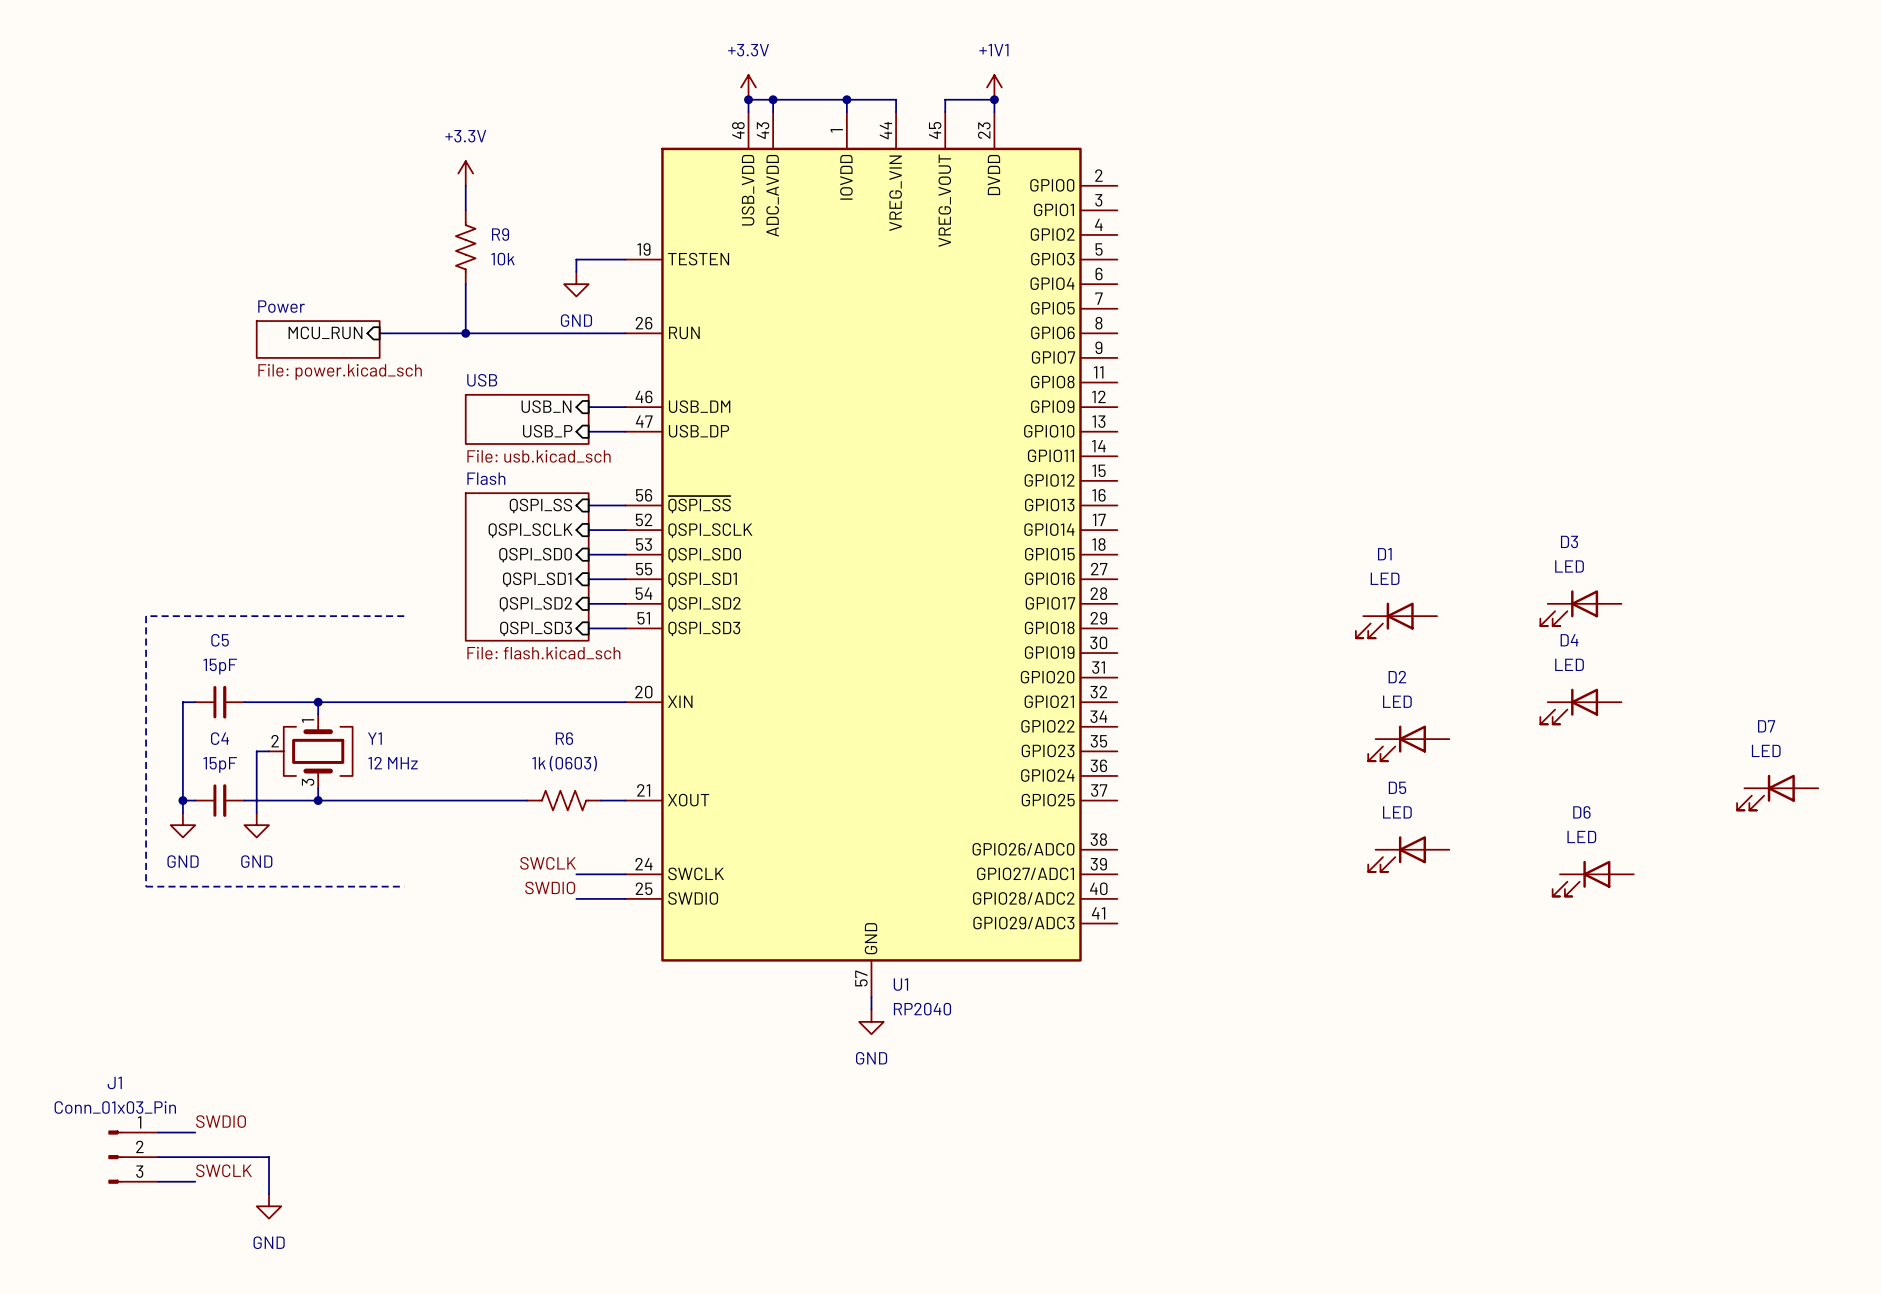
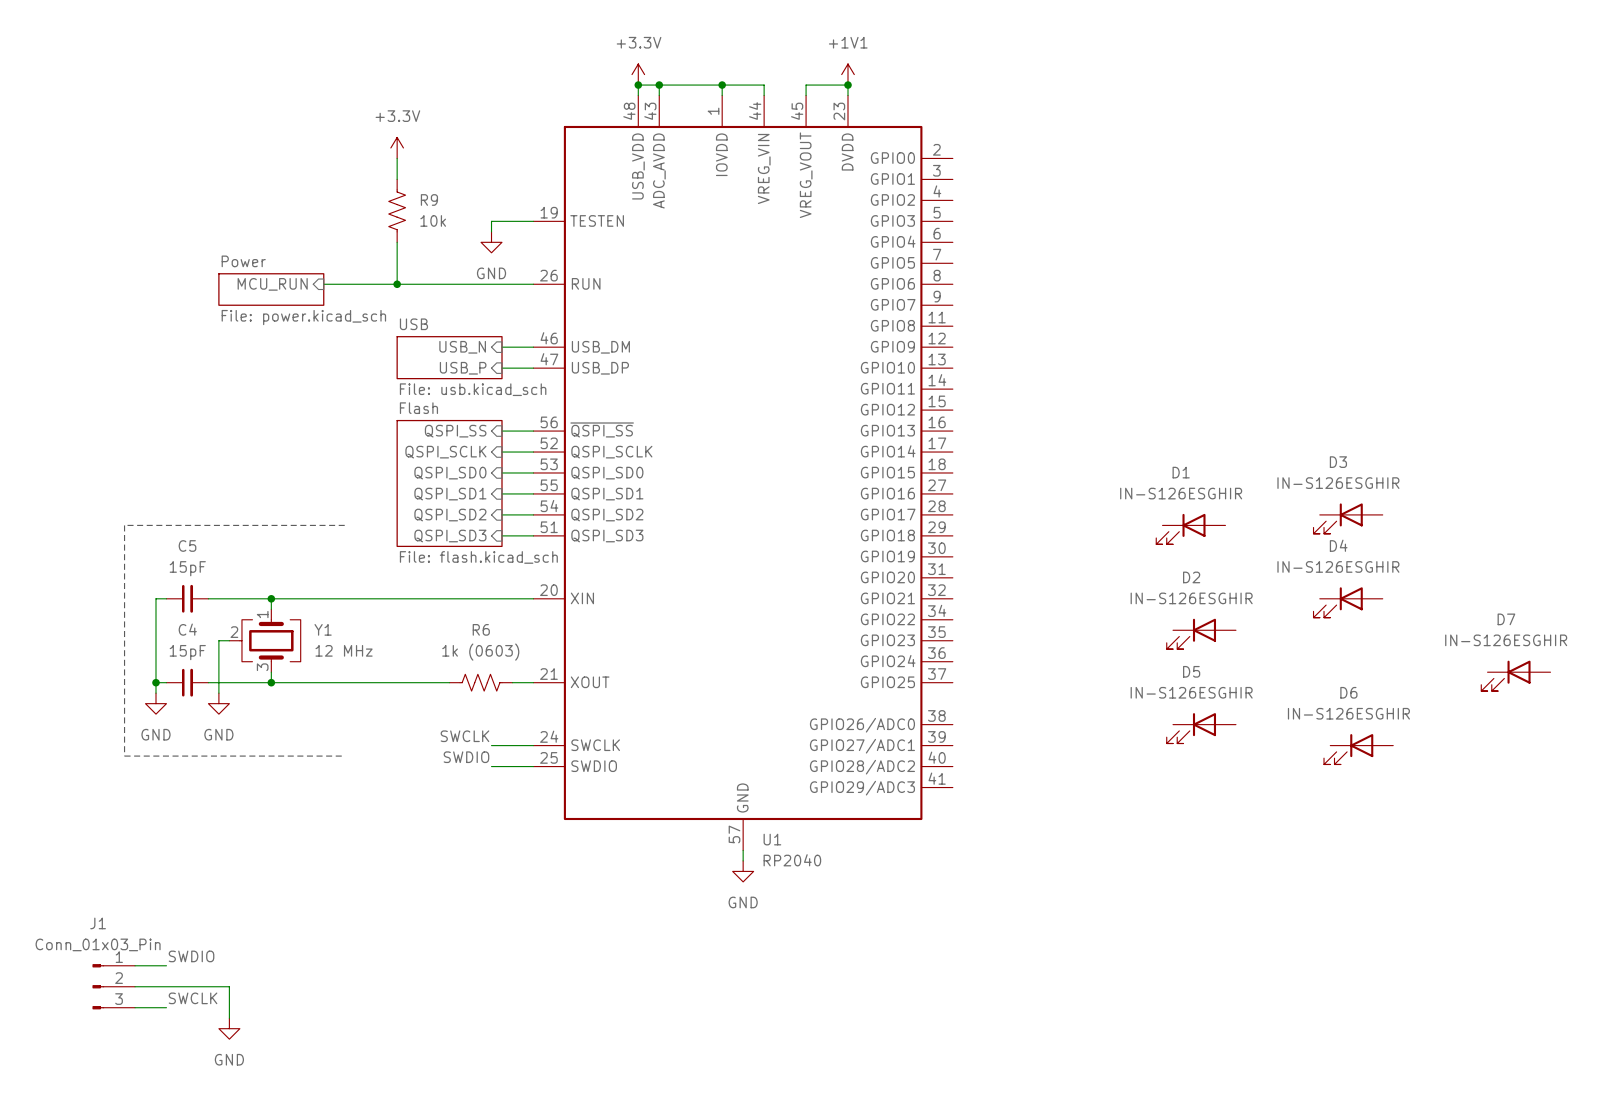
D3 value: LED (1569, 566) -> IN-S126ESGHIR (1338, 483)
D1 value: LED (1385, 578) -> IN-S126ESGHIR (1181, 493)
D4 value: LED (1569, 664) -> IN-S126ESGHIR (1338, 566)
D2 value: LED (1397, 701) -> IN-S126ESGHIR (1191, 598)
D7 value: LED (1766, 750) -> IN-S126ESGHIR (1506, 640)
D5 value: LED (1397, 812) -> IN-S126ESGHIR (1191, 692)
D6 value: LED (1581, 836) -> IN-S126ESGHIR (1348, 713)

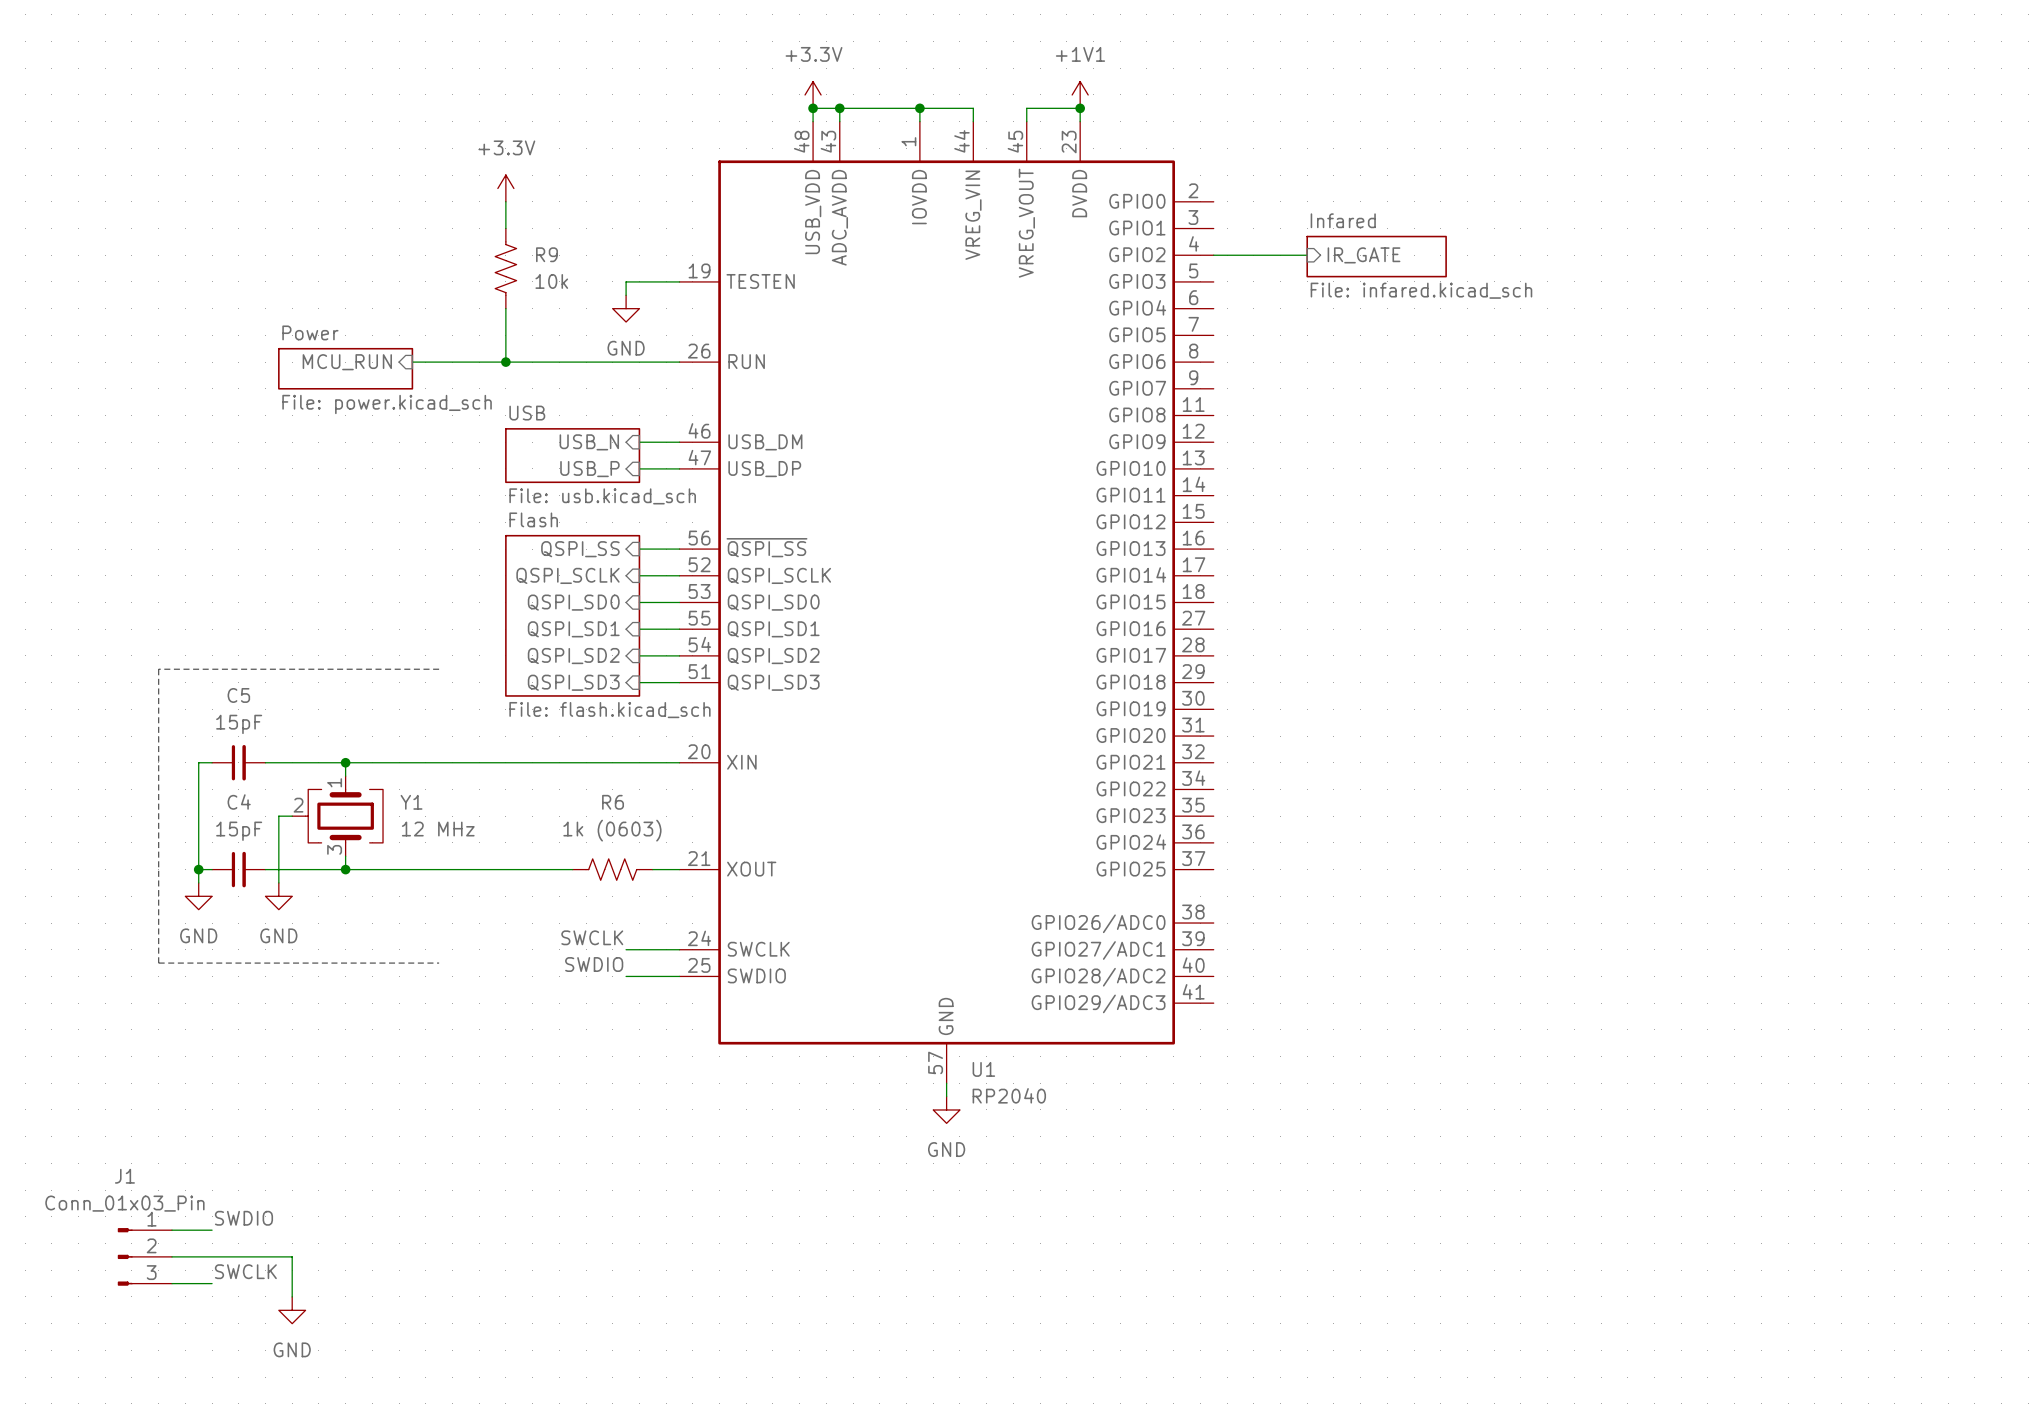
wire: none -> (1213, 255) (1307, 255)
sheet pin: none -> IR_GATE (1364, 255)
sheet Infared: none -> File: infared.kicad_sch (1376, 256)
D3: IN-S126ESGHIR (1348, 518) -> none
D1: IN-S126ESGHIR (1190, 529) -> none
D4: IN-S126ESGHIR (1348, 602) -> none
D2: IN-S126ESGHIR (1201, 633) -> none
D7: IN-S126ESGHIR (1515, 675) -> none
D5: IN-S126ESGHIR (1201, 728) -> none
D6: IN-S126ESGHIR (1358, 749) -> none

